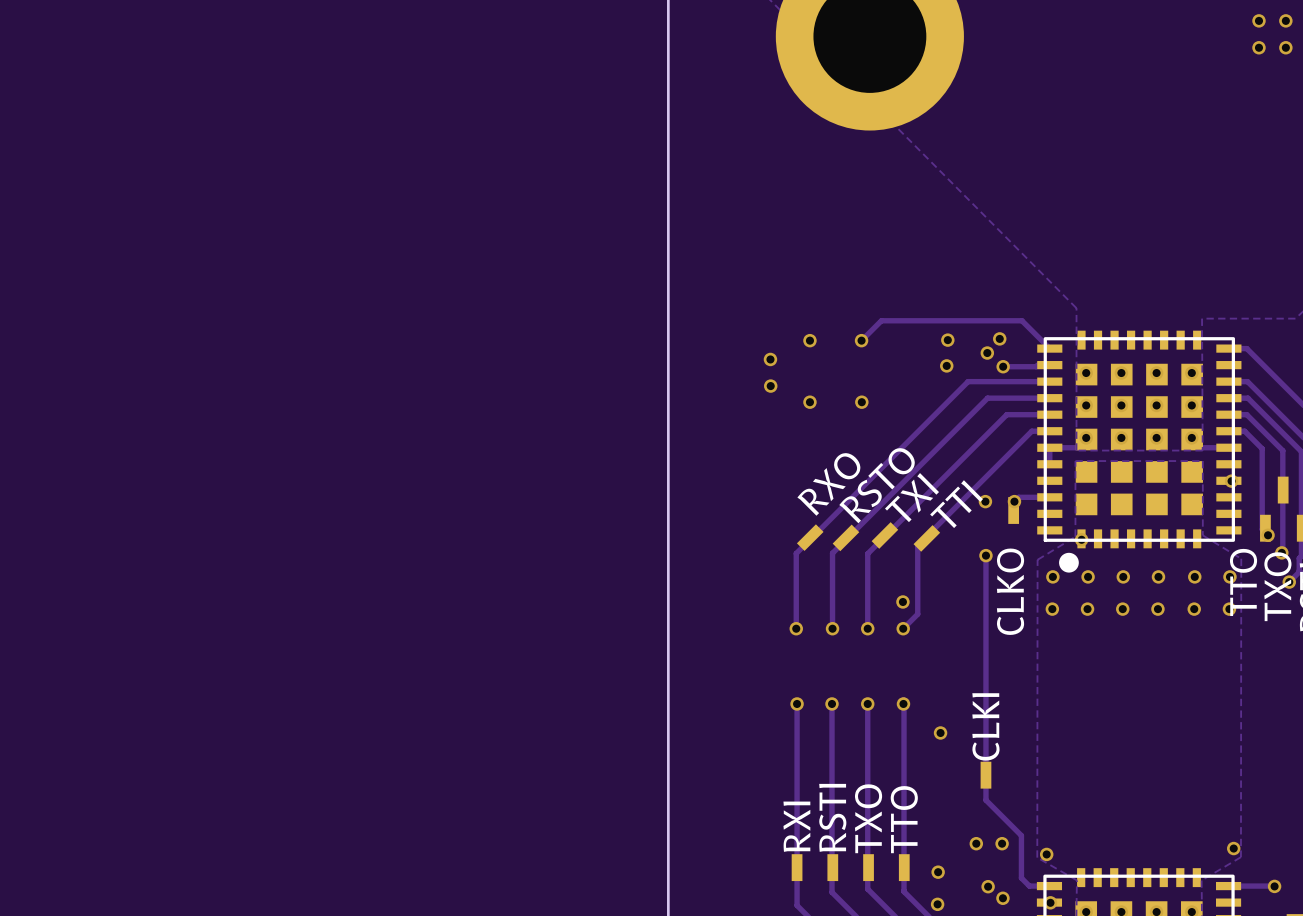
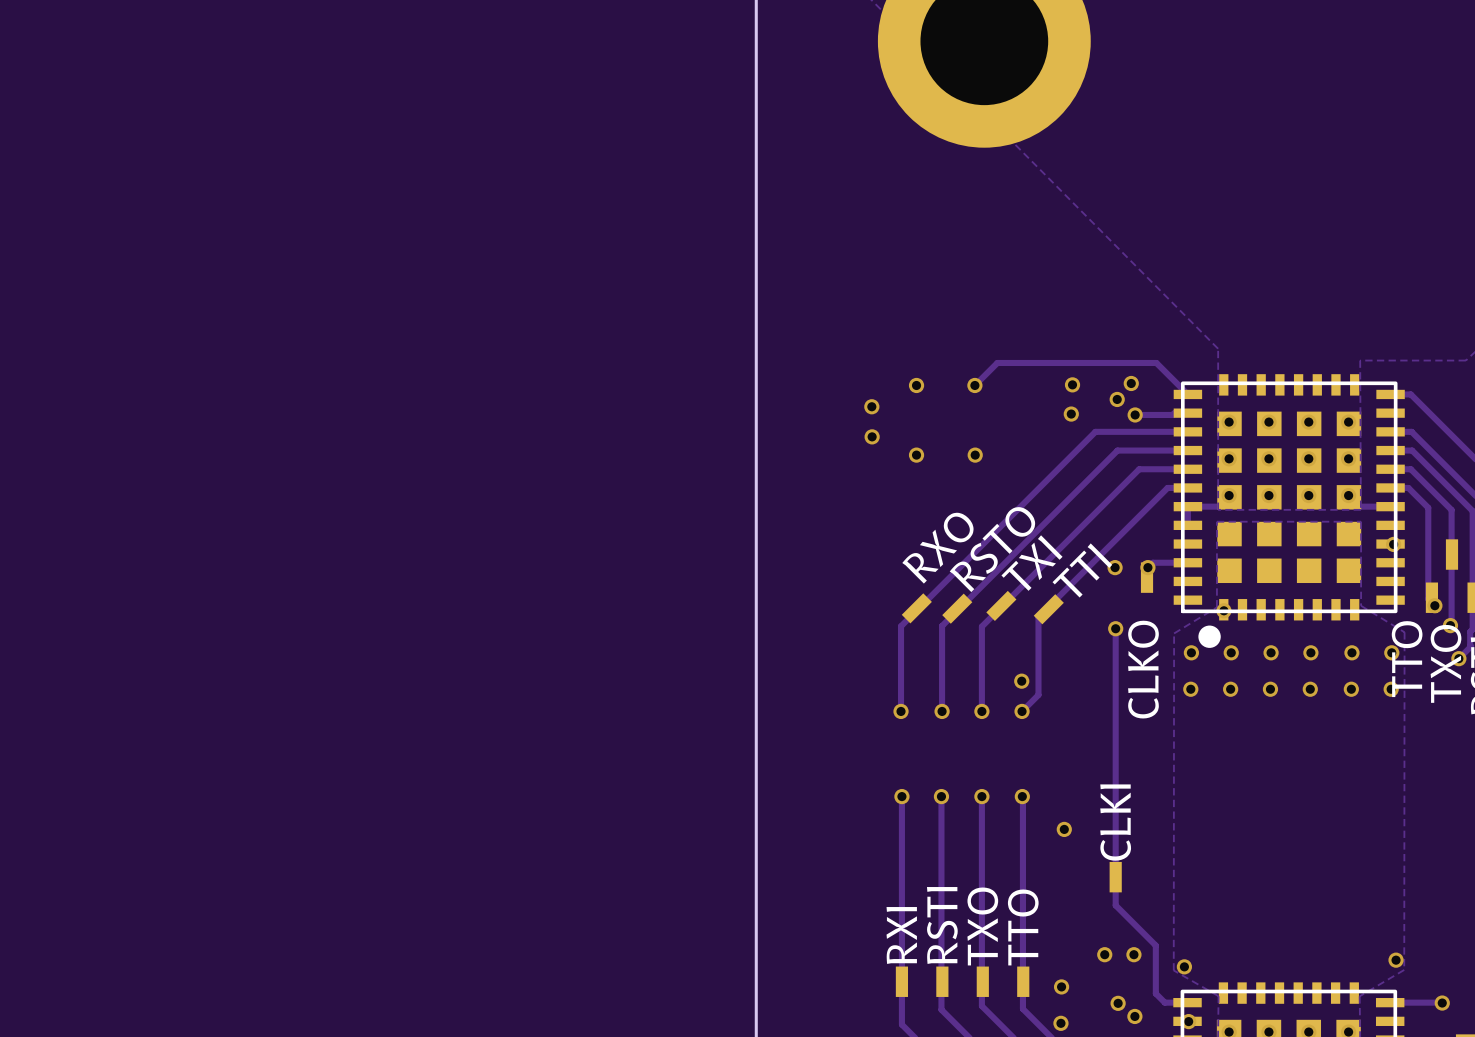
via: (1258, 20) -> none
via: (1285, 20) -> none
via: (1258, 47) -> none
via: (1285, 47) -> none

